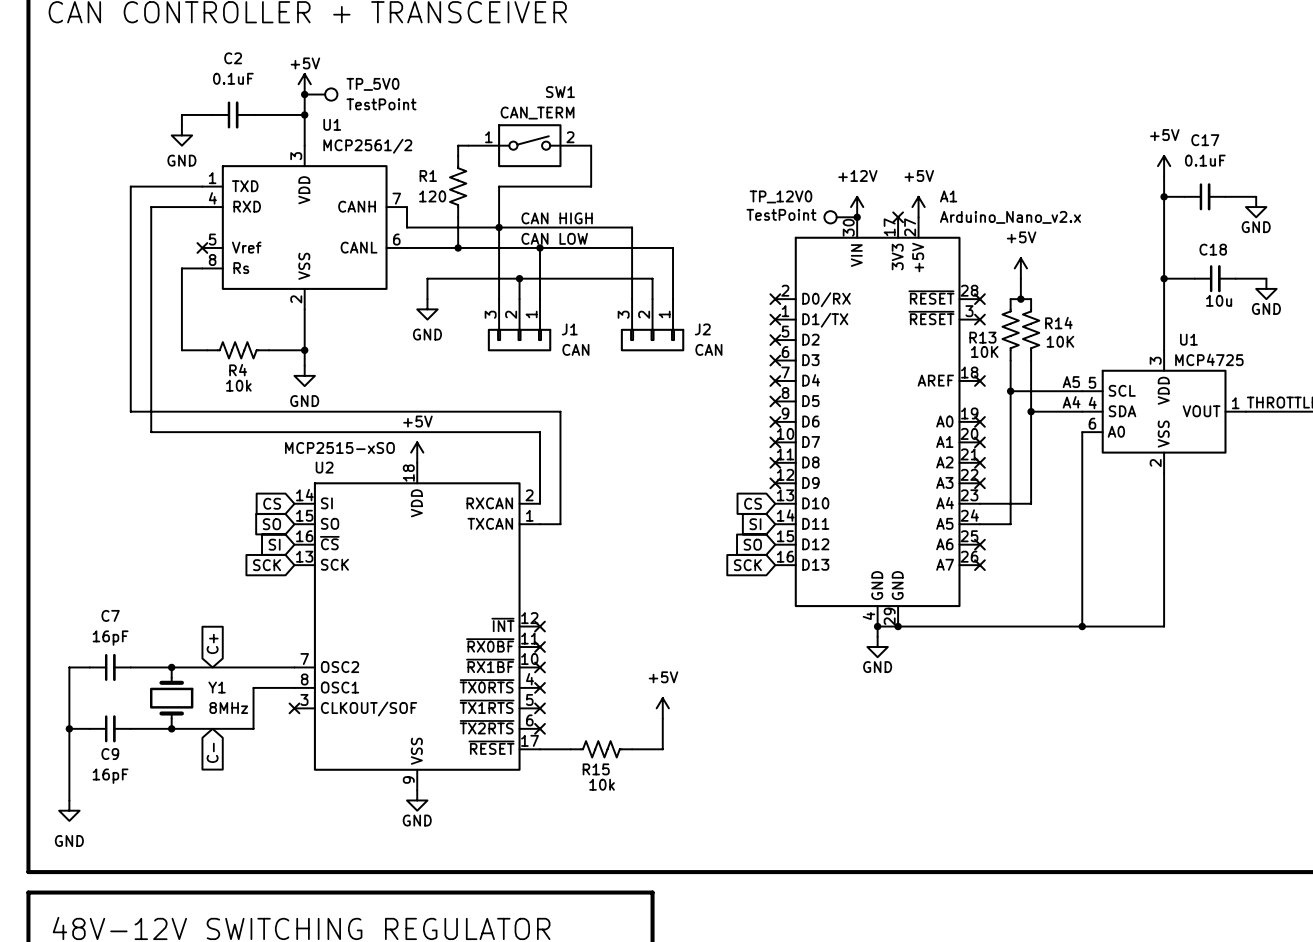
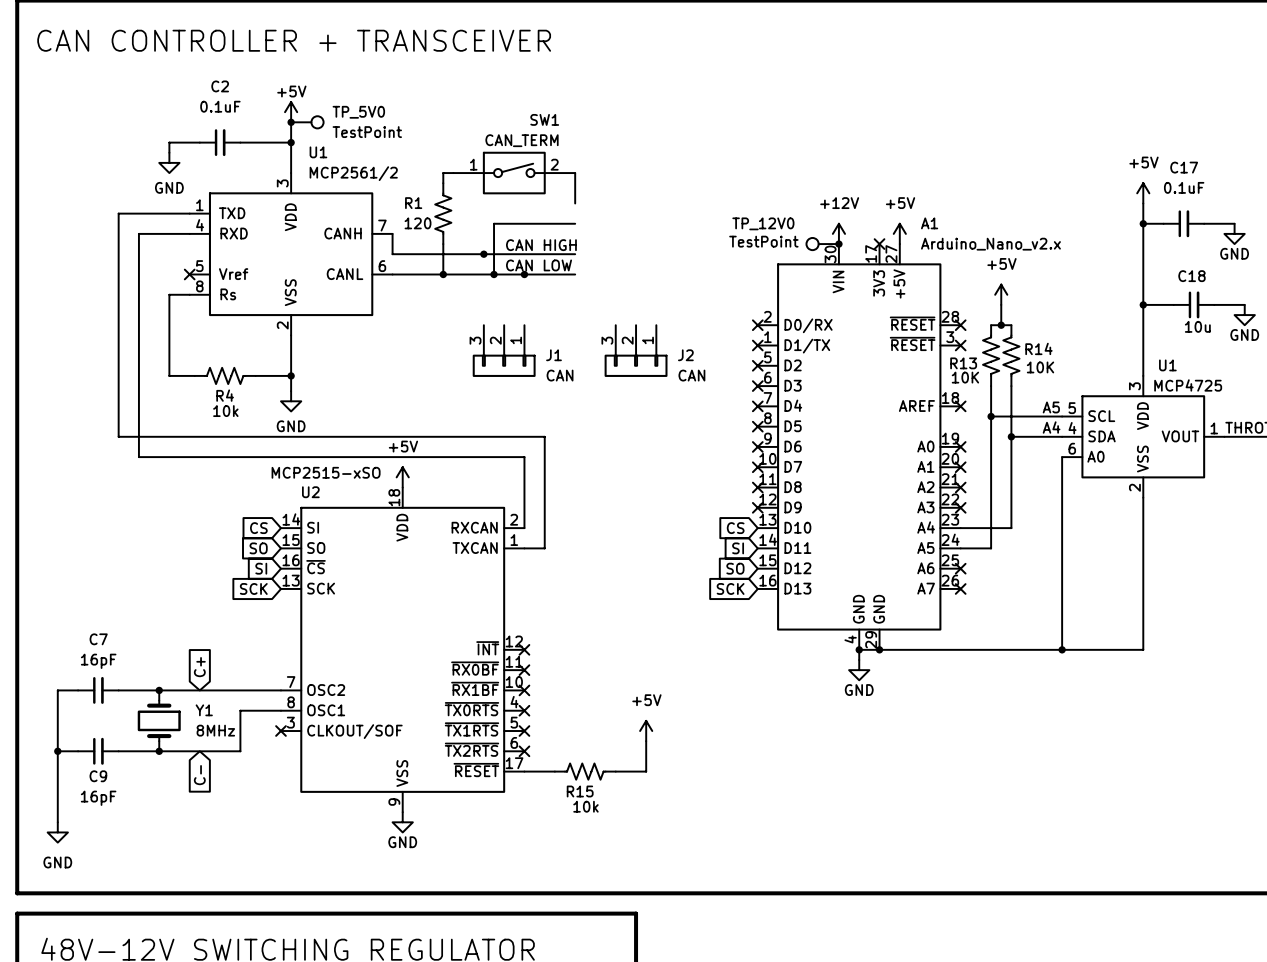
wire: (591, 176) (591, 186) (499, 186) (499, 299) -> none
wire: none -> (575, 223) (494, 223) (494, 274)
wire: (591, 227) (632, 227) (632, 299) -> none
wire: (540, 247) (540, 299) -> none
wire: (591, 247) (673, 247) (673, 299) -> none
wire: (519, 278) (519, 299) -> none
junction position: (519, 278) -> (494, 274)
wire: (427, 299) (427, 278) (652, 278) (652, 299) -> none
power symbol: GND (427, 309) -> none

